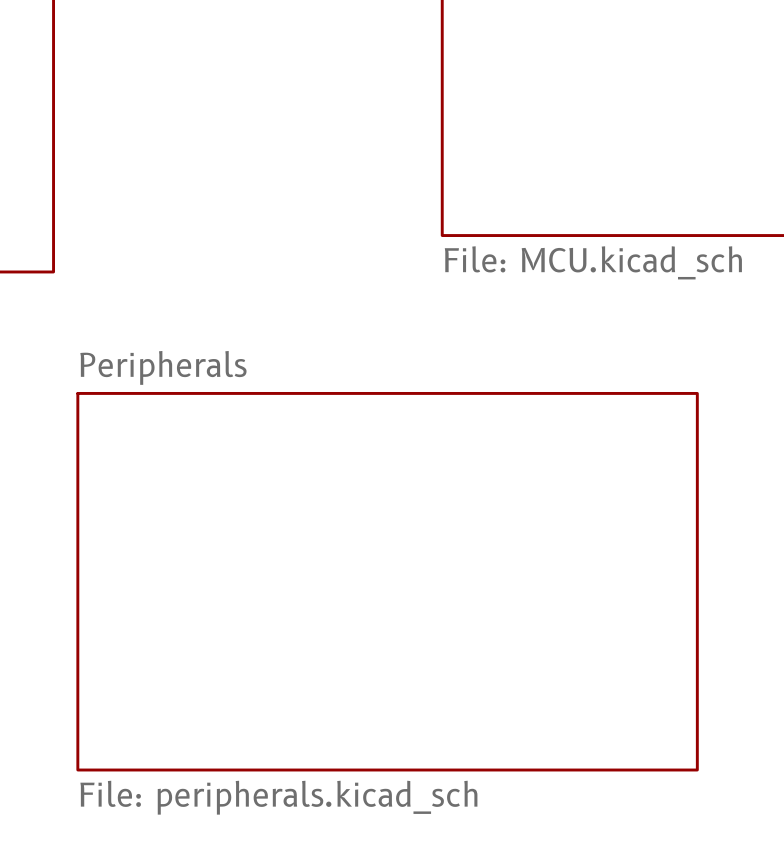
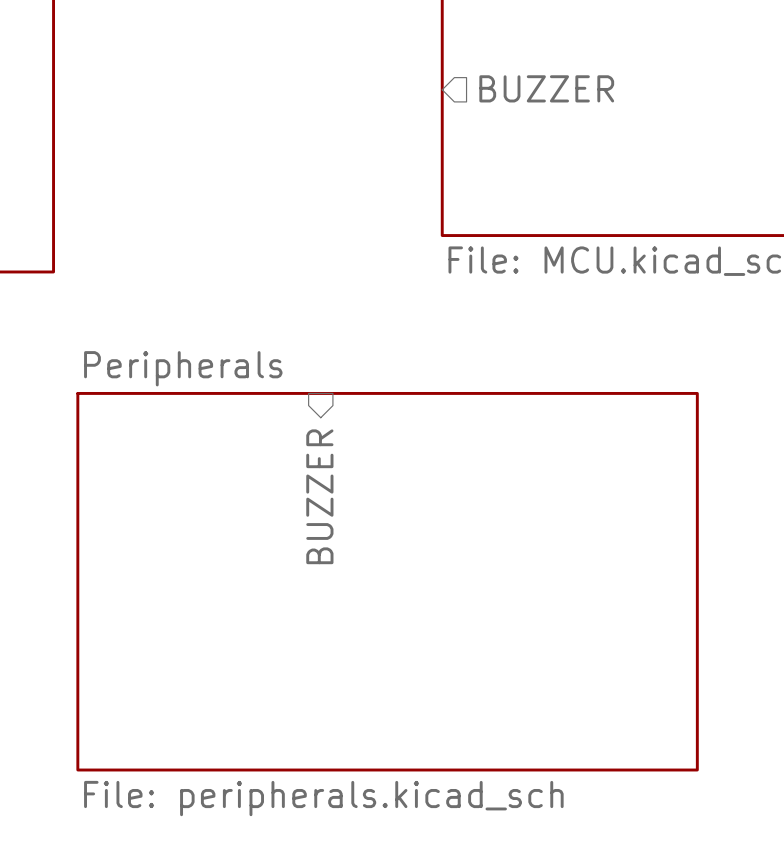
sheet pin: none -> BUZZER (546, 88)
sheet pin: none -> BUZZER (319, 496)

